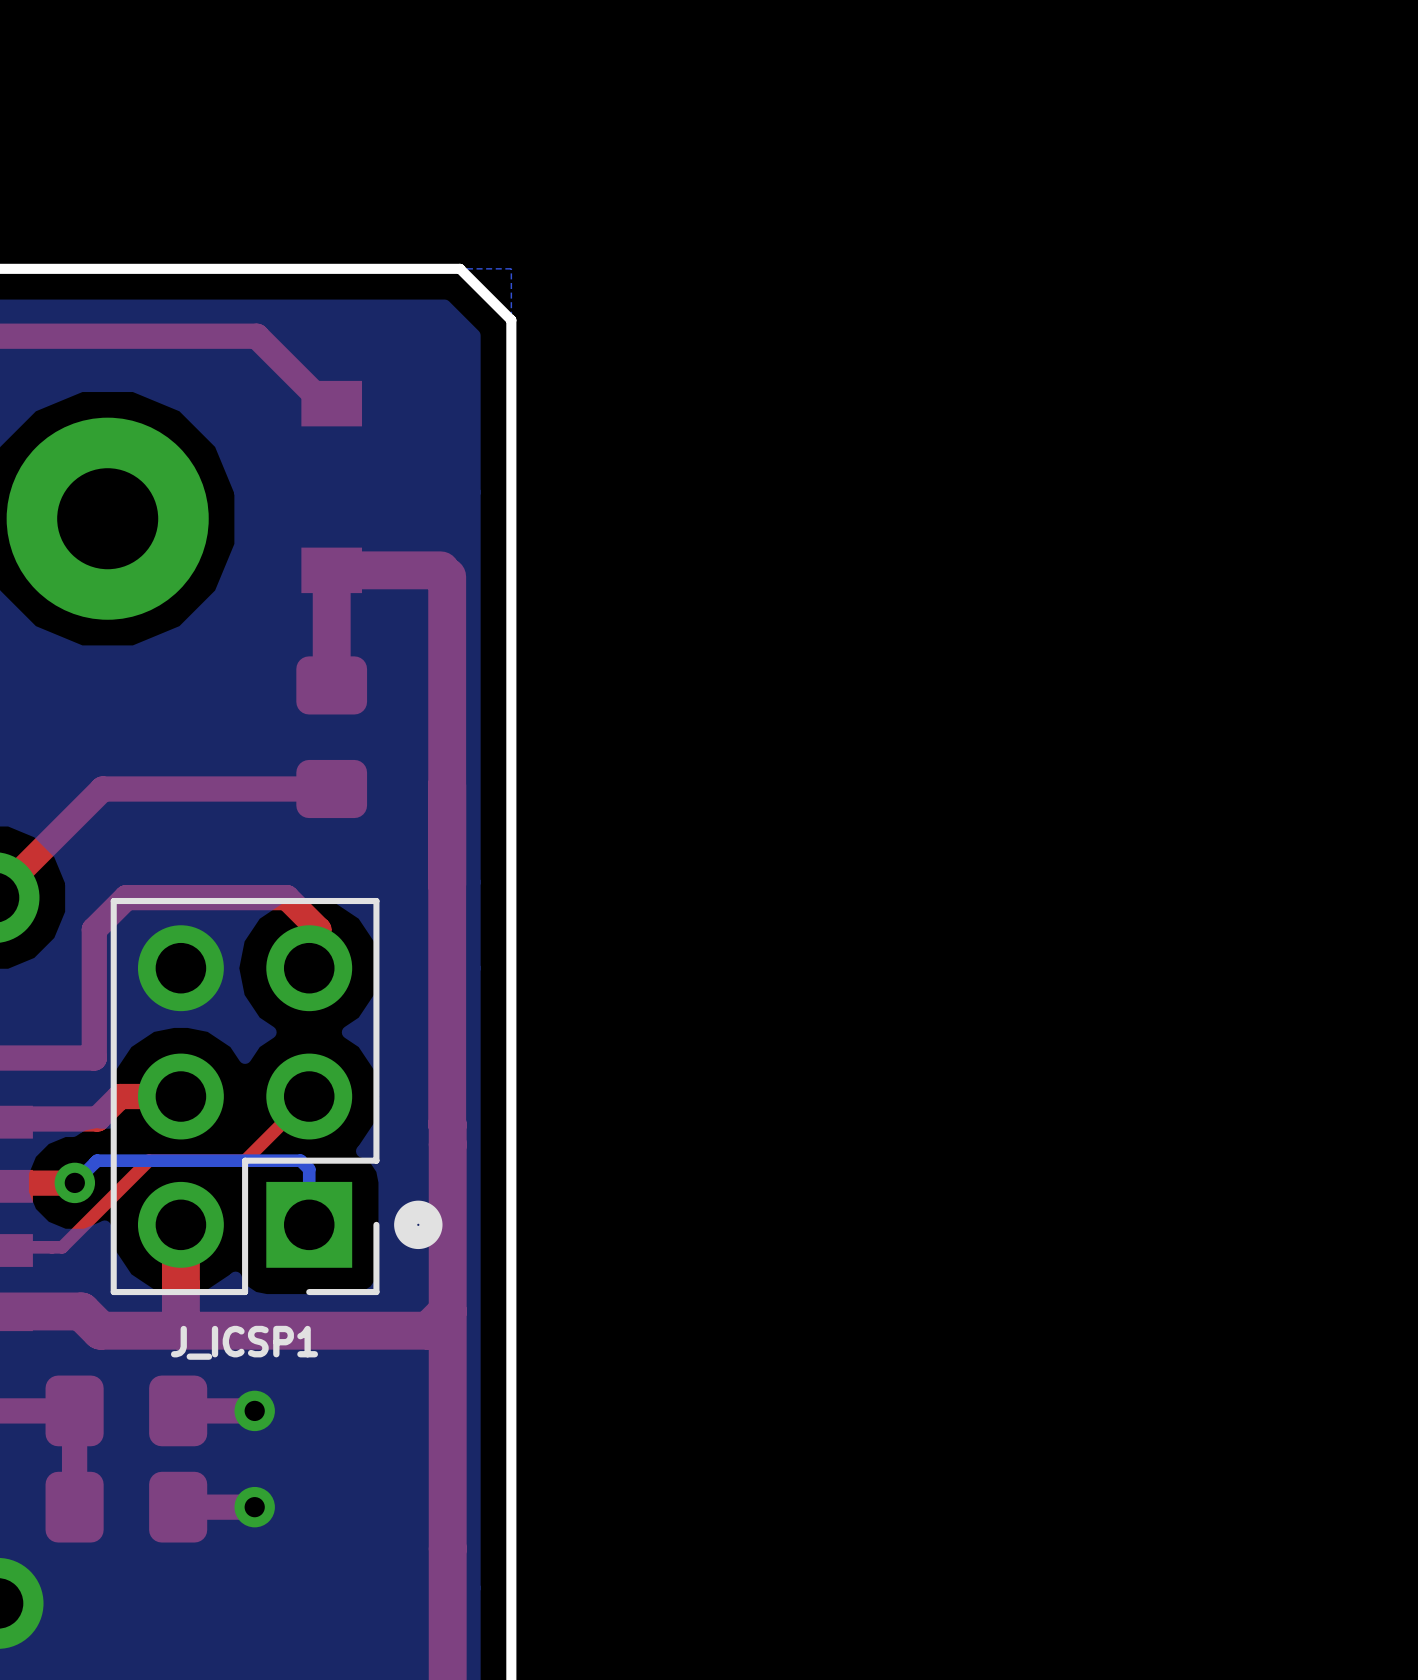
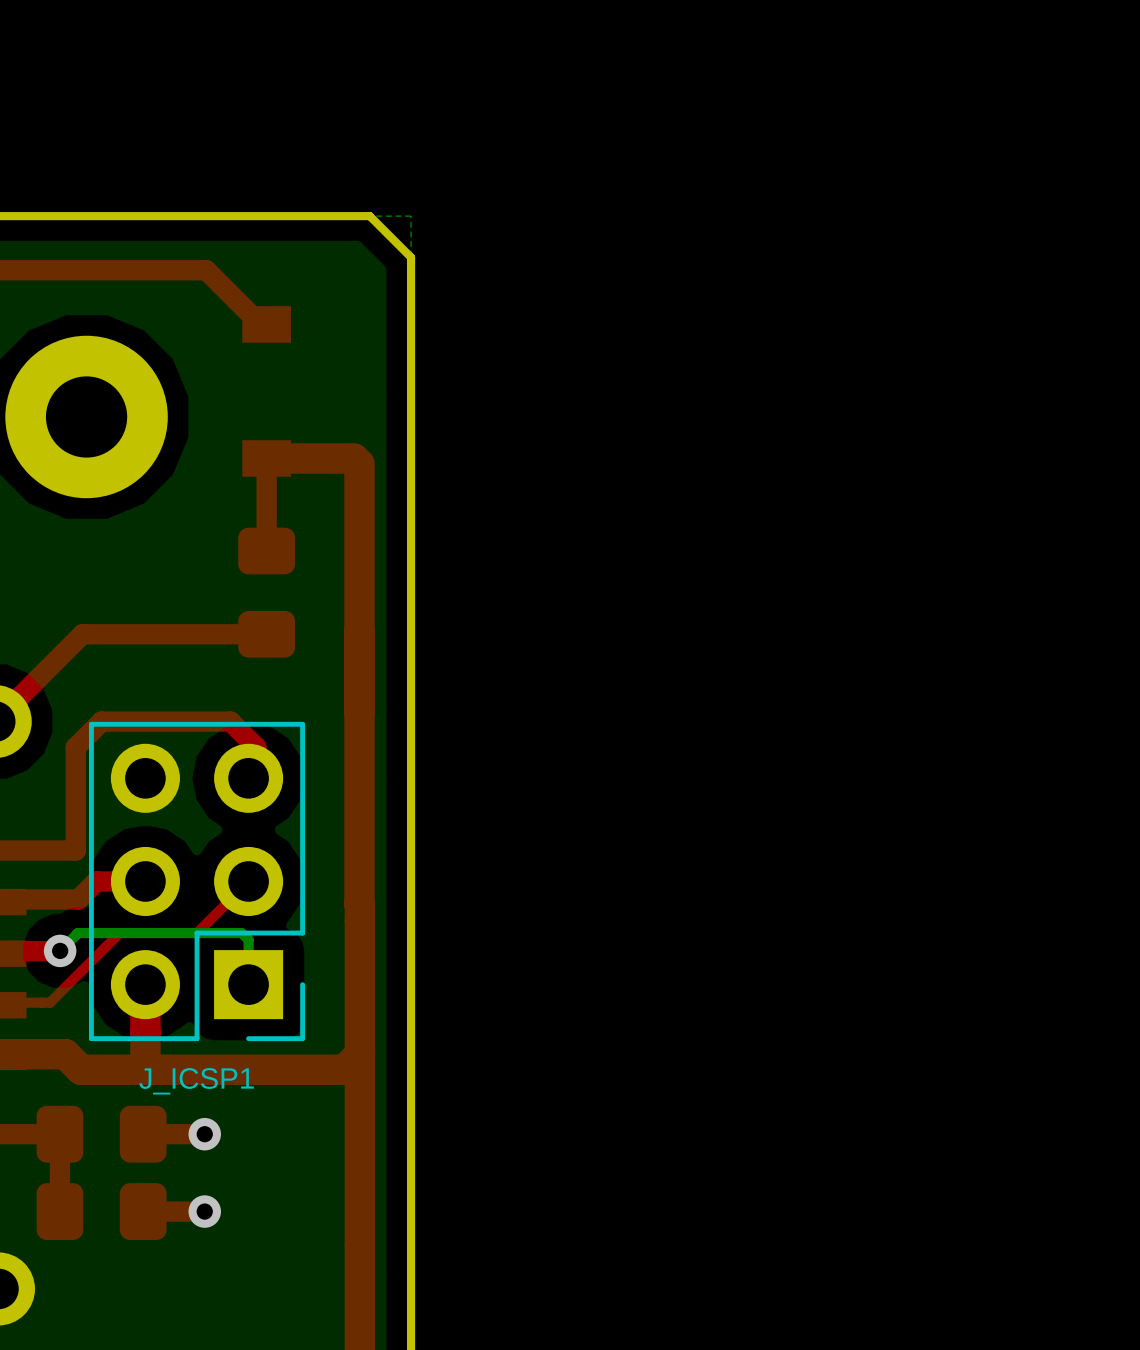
top track width: thick (331, 570) (331, 685) -> thin (266, 458) (266, 551)
drawing: [394, 1200, 443, 1250] -> none

